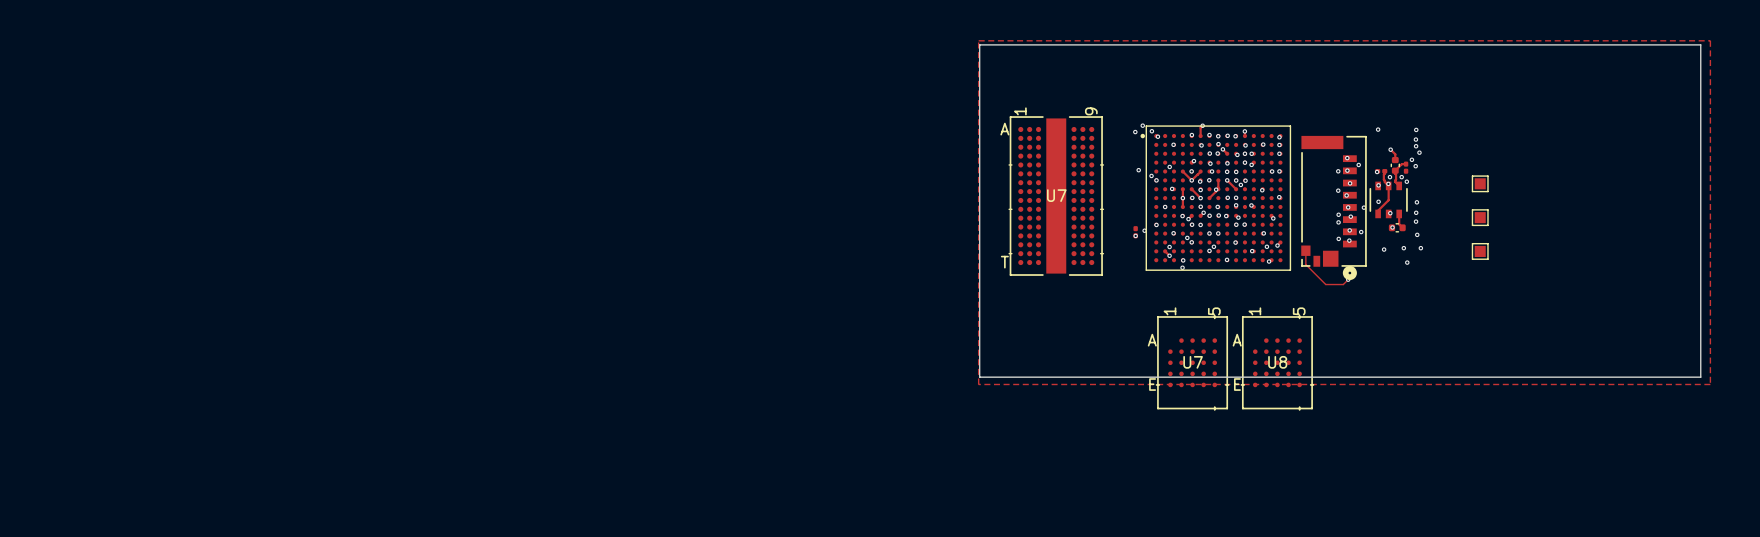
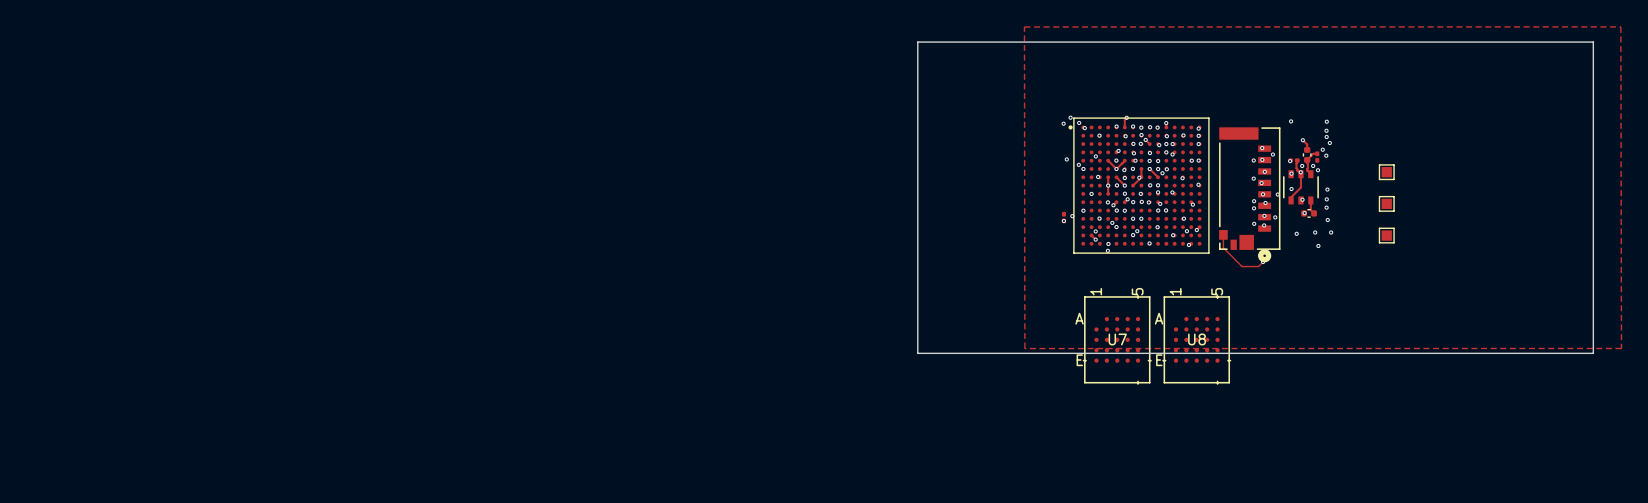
zone outline: (978, 40) (1710, 40) (1710, 384) (978, 384) (978, 40) -> (1620, 26) (1024, 27) (1024, 348) (1621, 348) (1620, 26)
U7: (1056, 196) -> none

